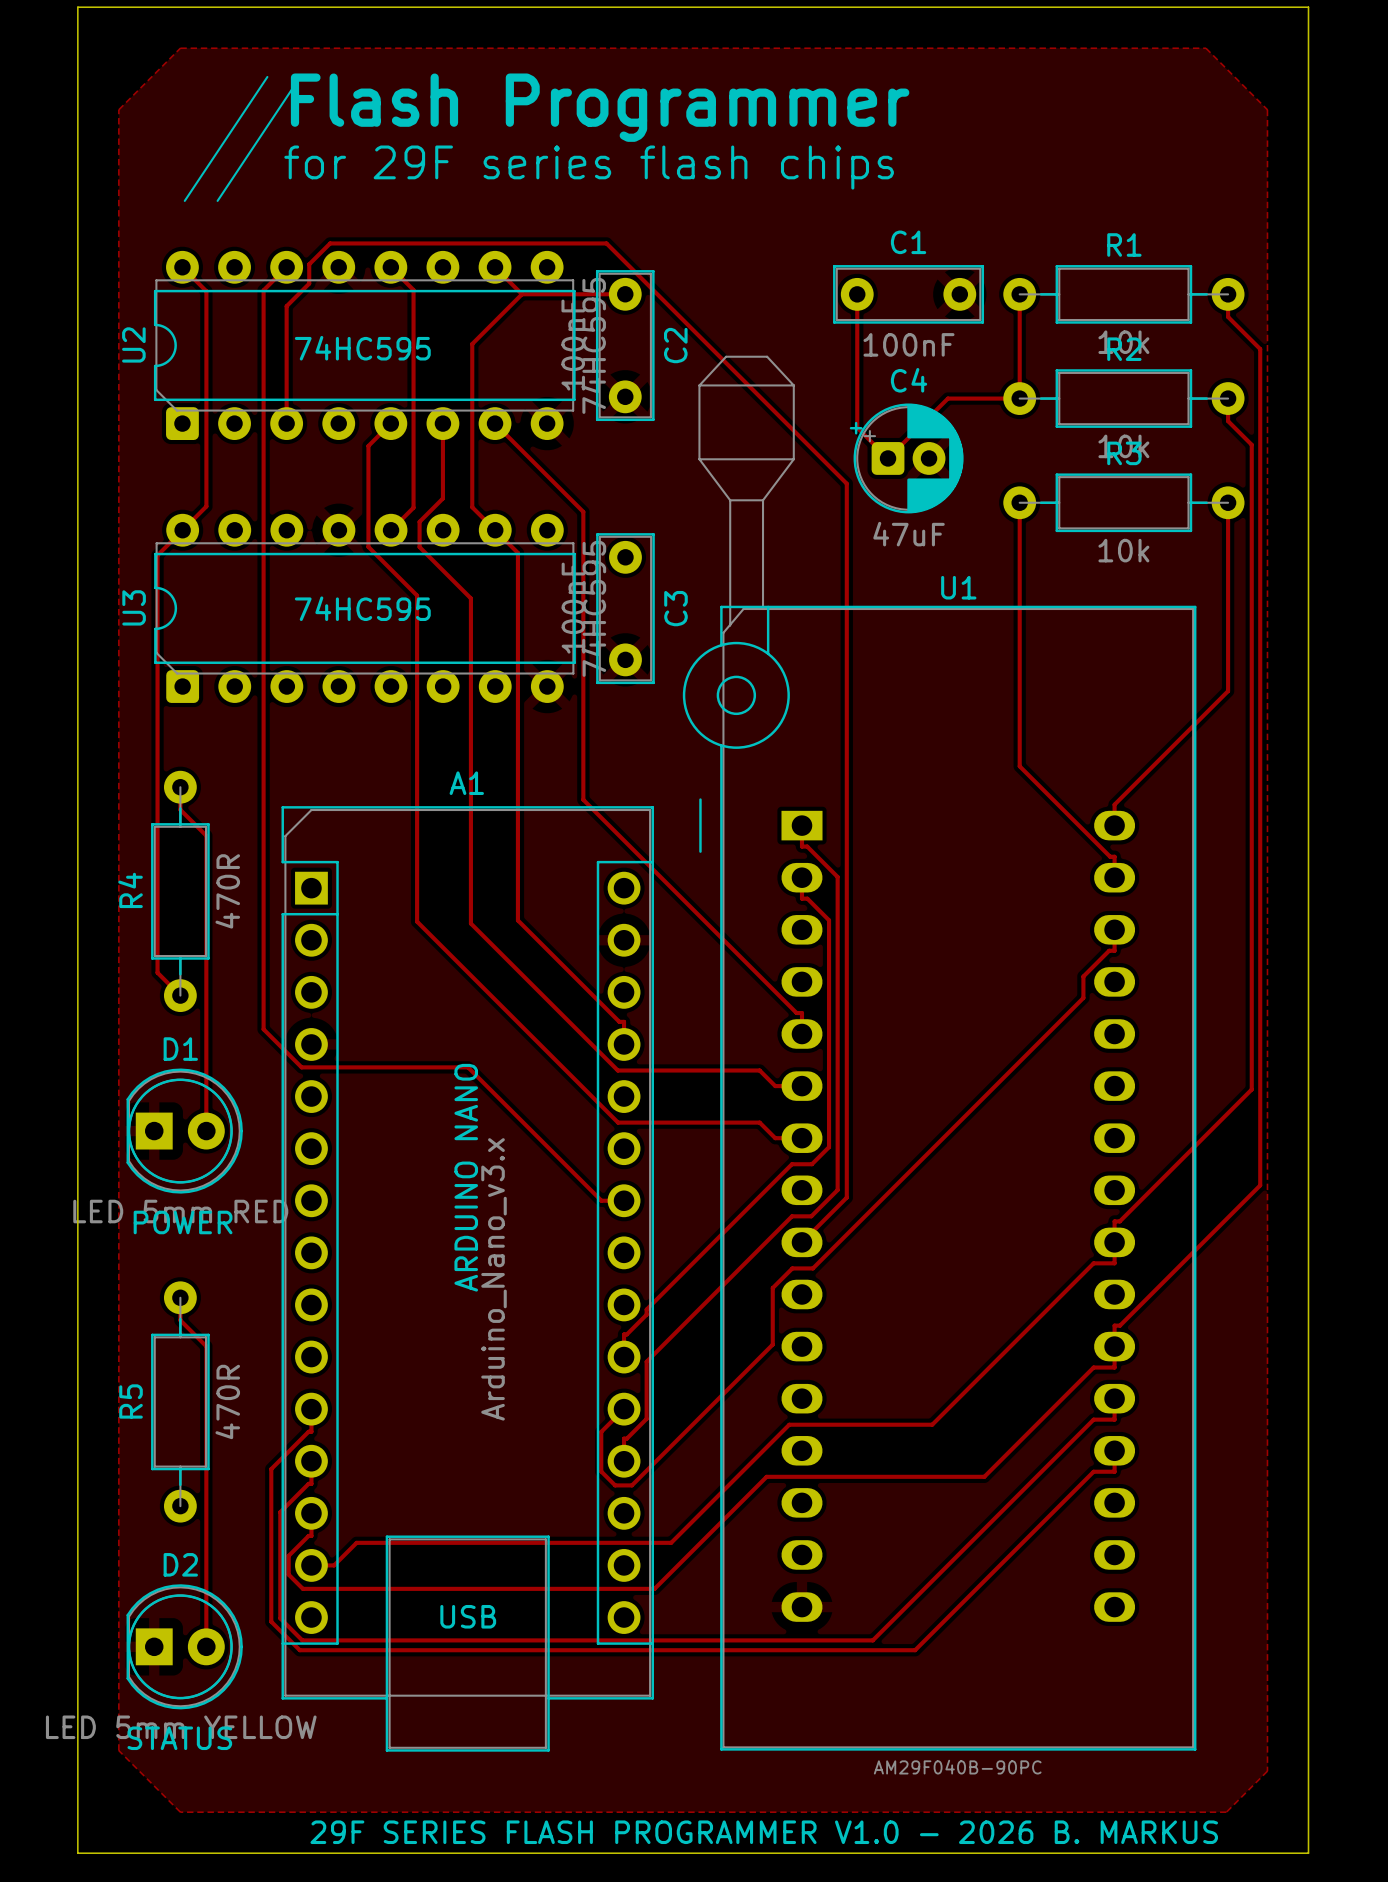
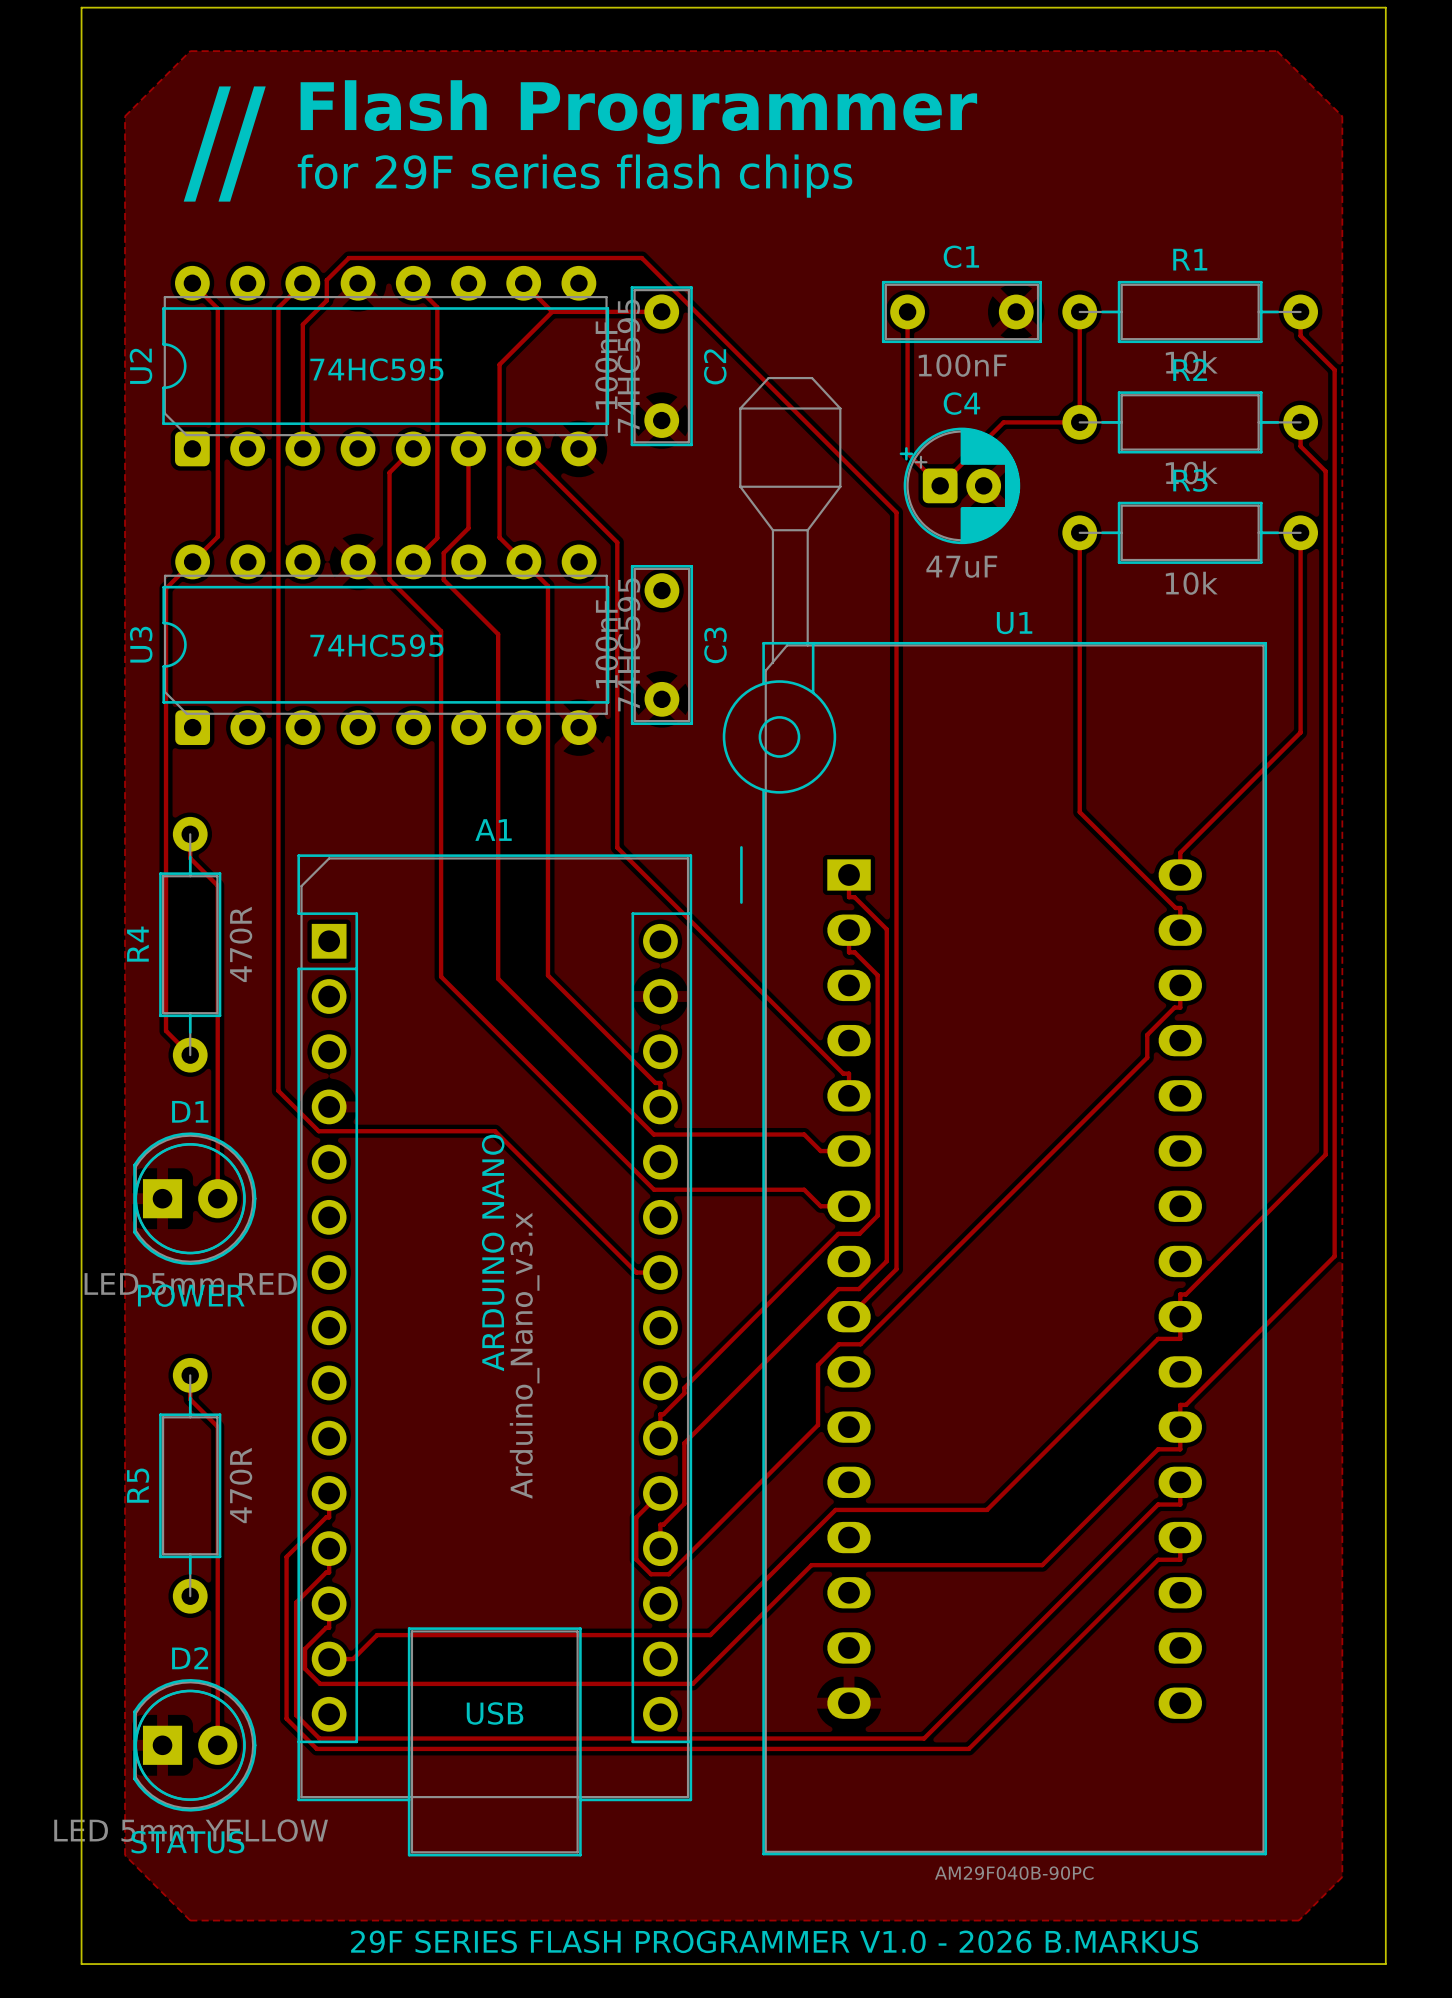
text: 29F SERIES FLASH PROGRAMMER V1.0 - 2026 B. MARKUS (764, 1832) -> 29F SERIES FLASH PROGRAMMER V1.0 - 2026 B.MARKUS (774, 1941)

